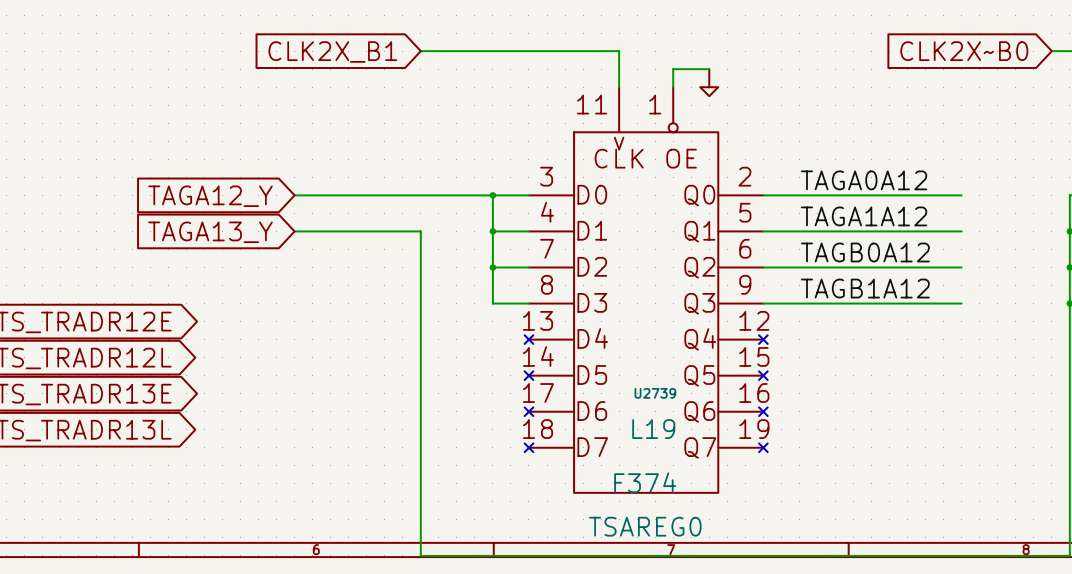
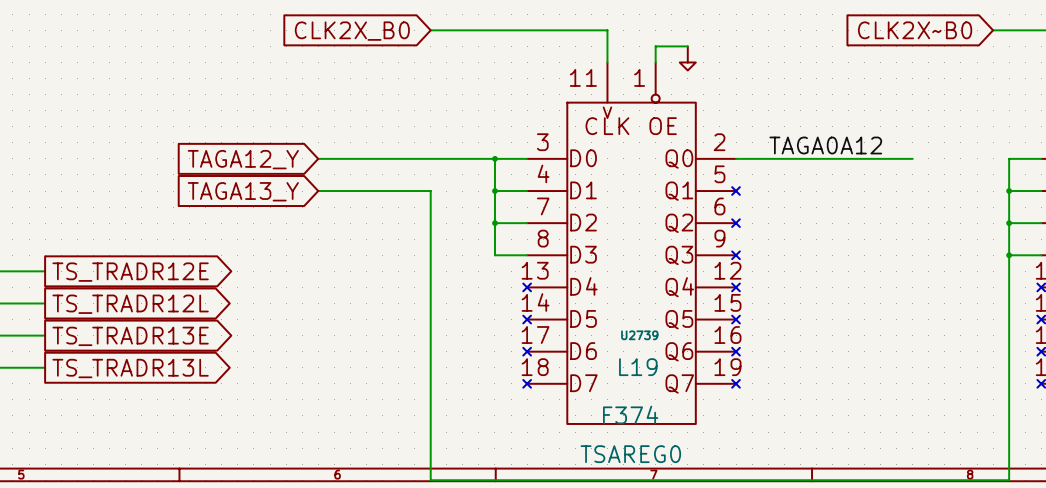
global label: CLK2X_B1 (332, 52) -> CLK2X_B0 (352, 31)
label: TAGA1A12 (864, 216) -> none
wire: (763, 231) (961, 231) -> none
no-connect mark: none -> (736, 191)
label: TAGB0A12 (865, 252) -> none
wire: (763, 267) (961, 267) -> none
no-connect mark: none -> (736, 223)
label: TAGB1A12 (865, 288) -> none
wire: (763, 303) (961, 303) -> none
no-connect mark: none -> (736, 255)

